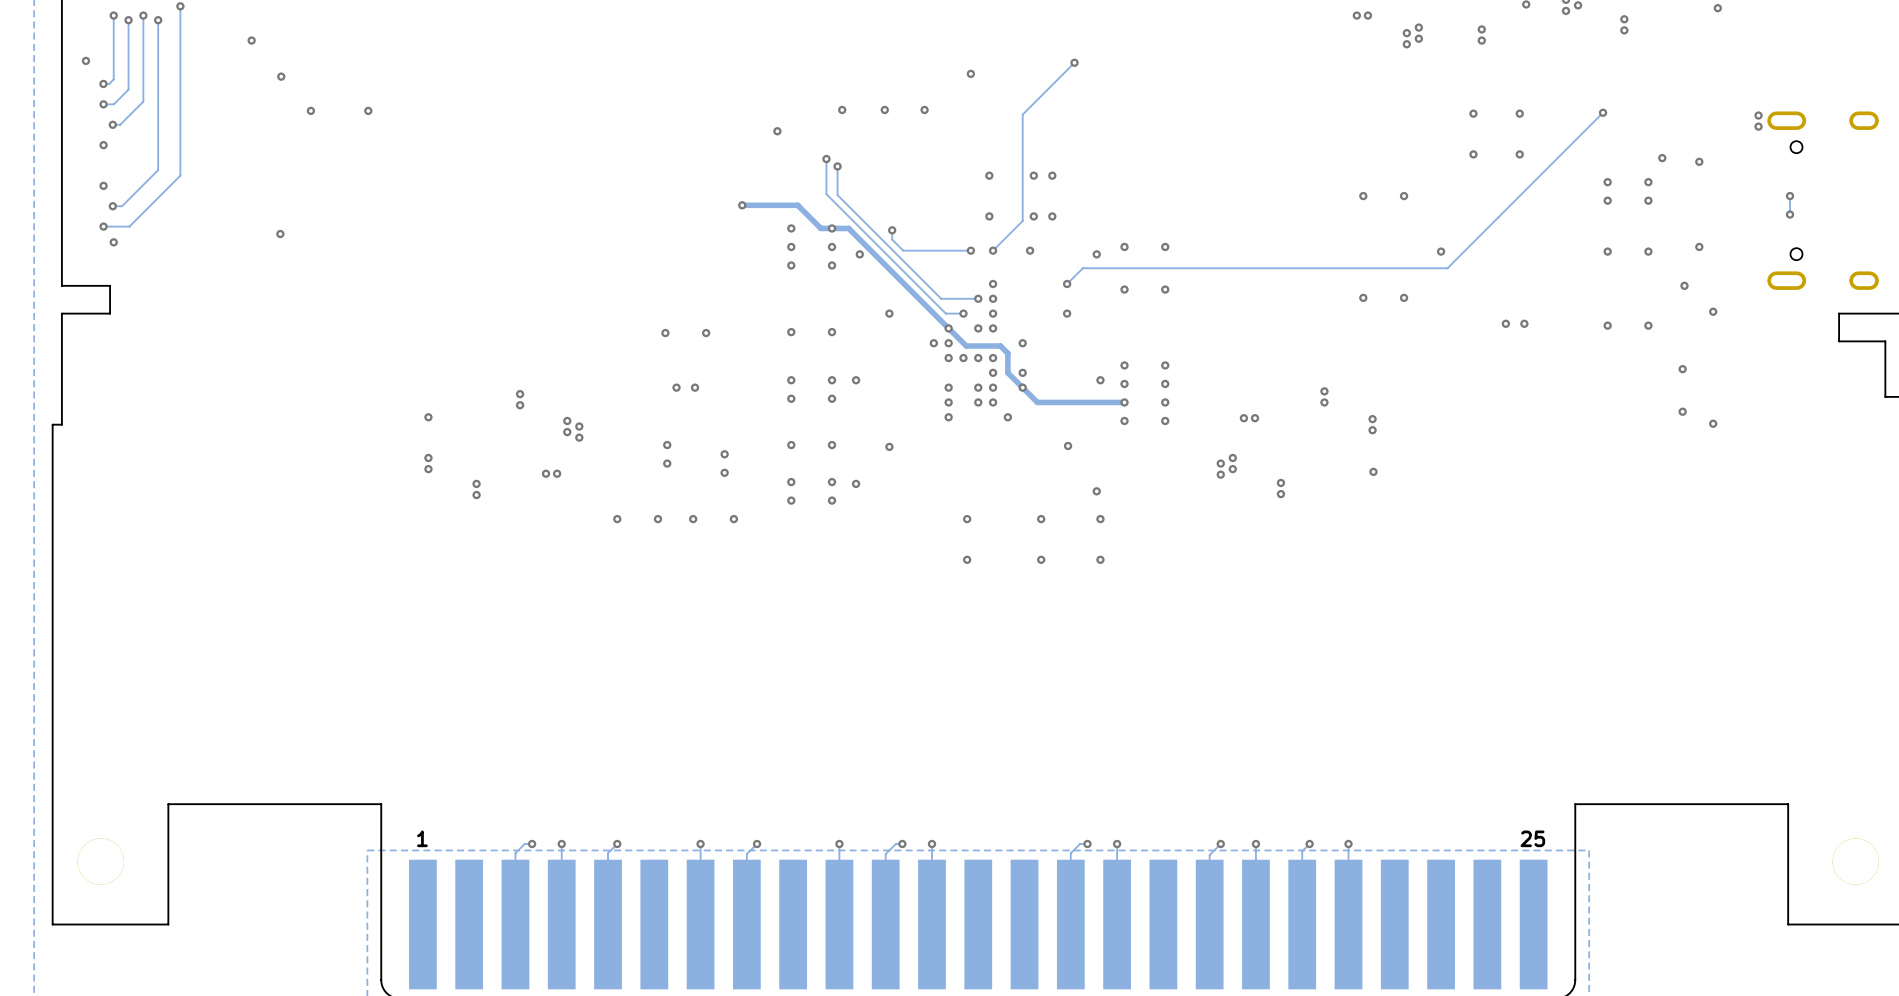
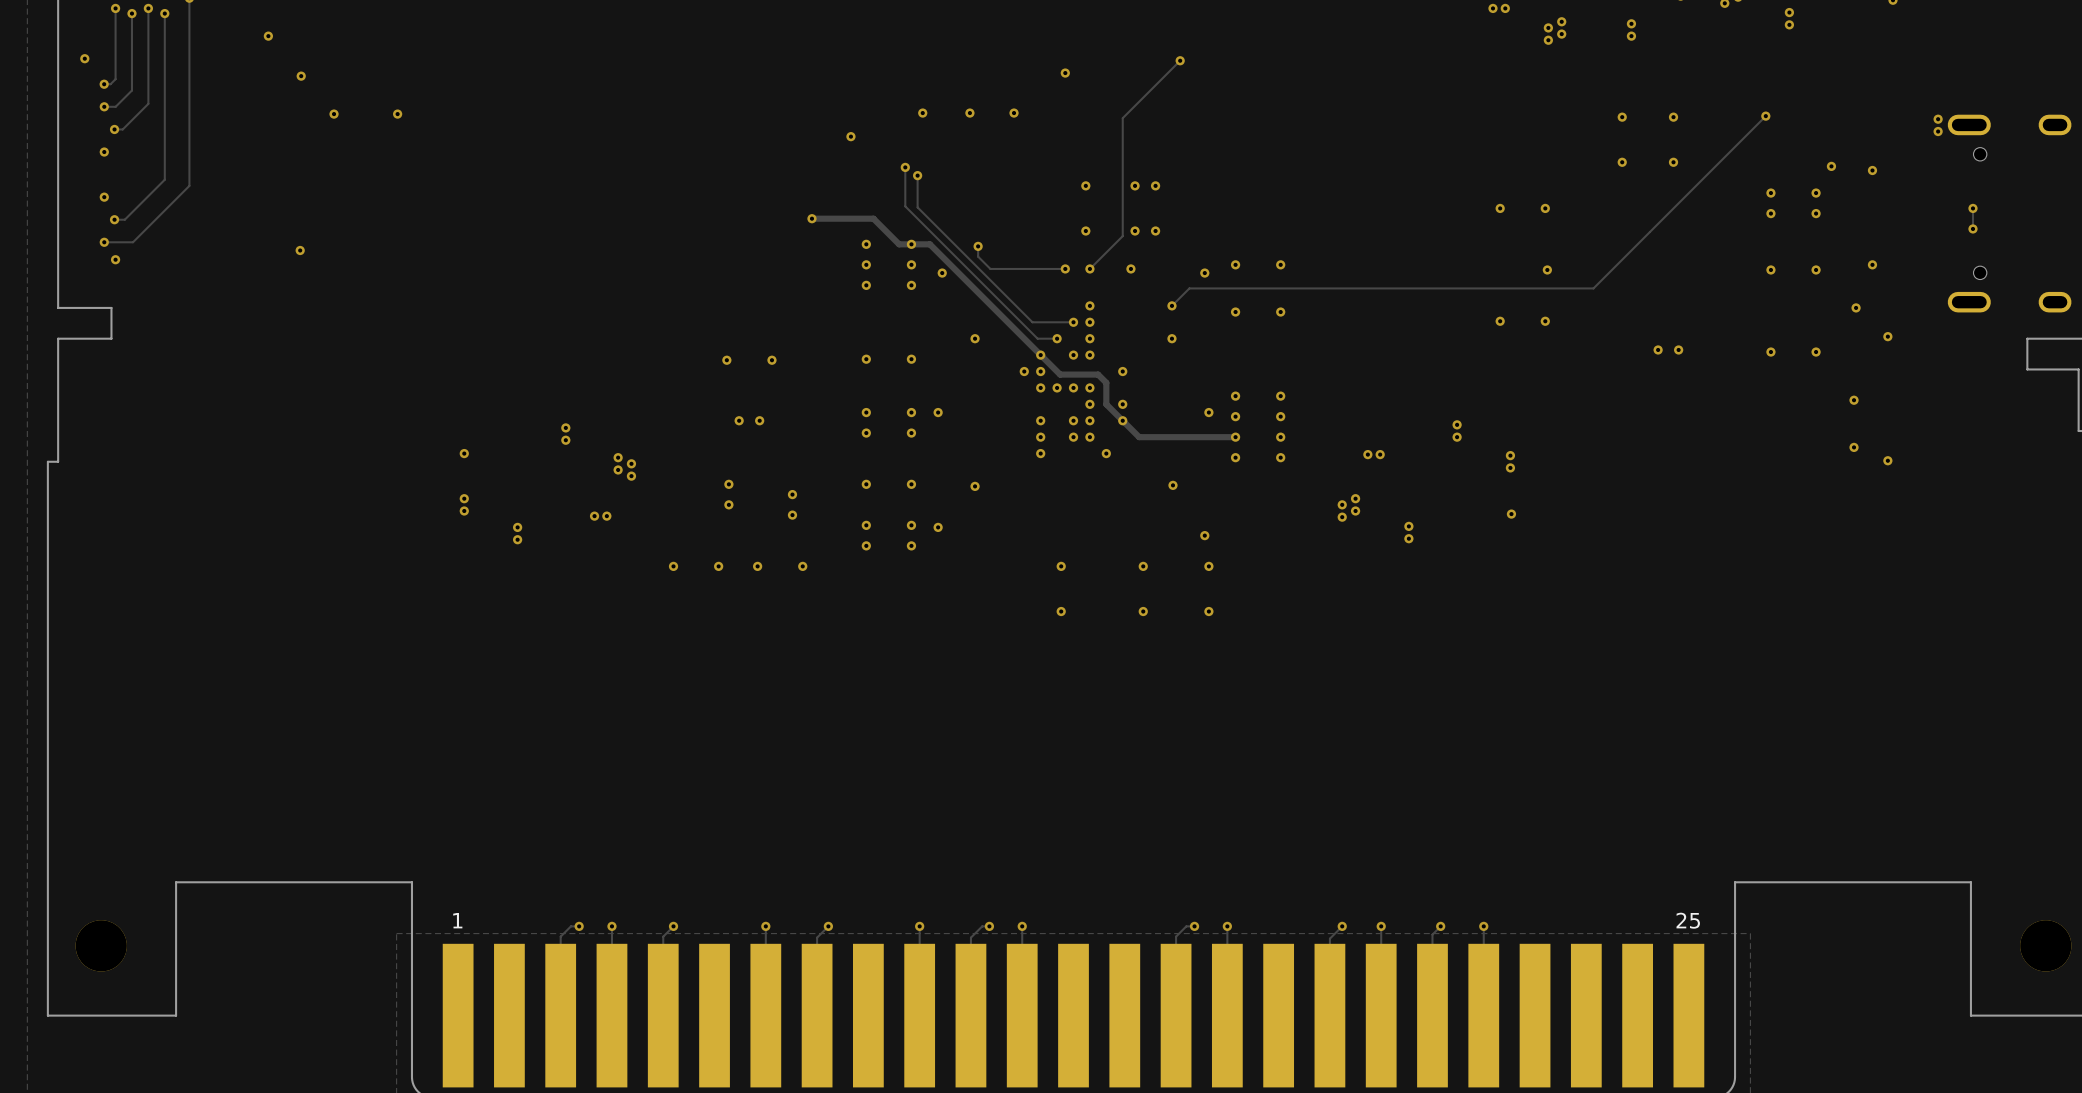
via position: (1441, 251) -> (1547, 269)

